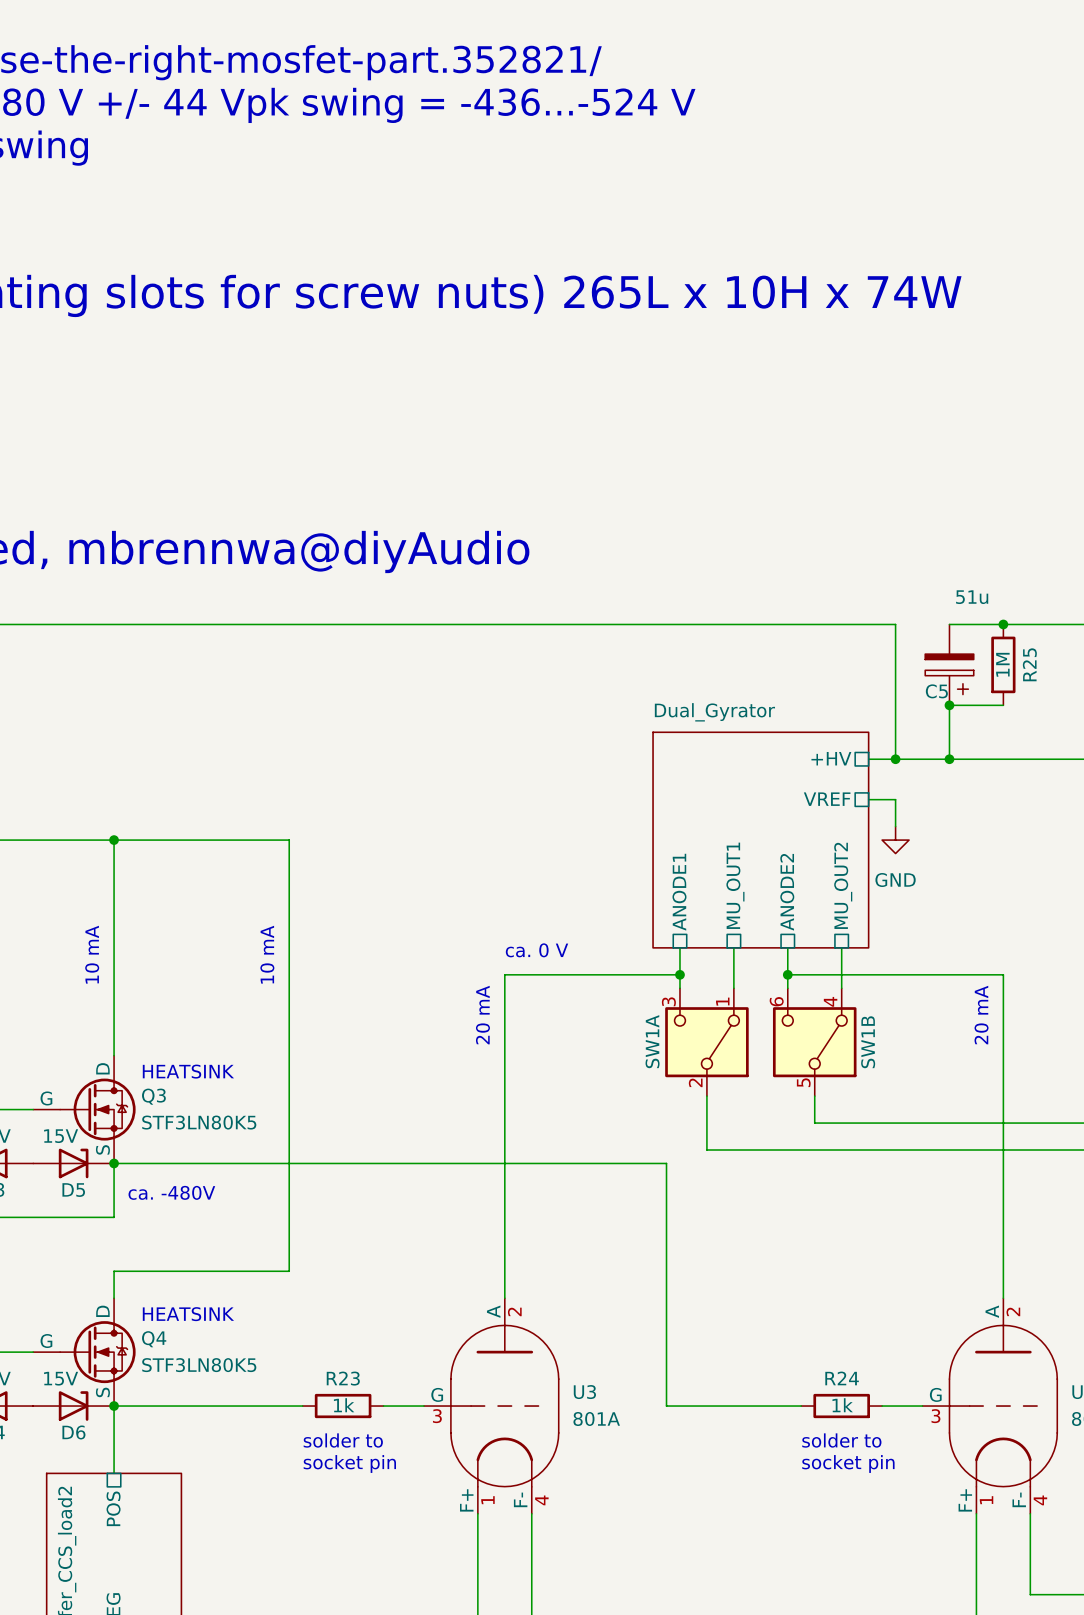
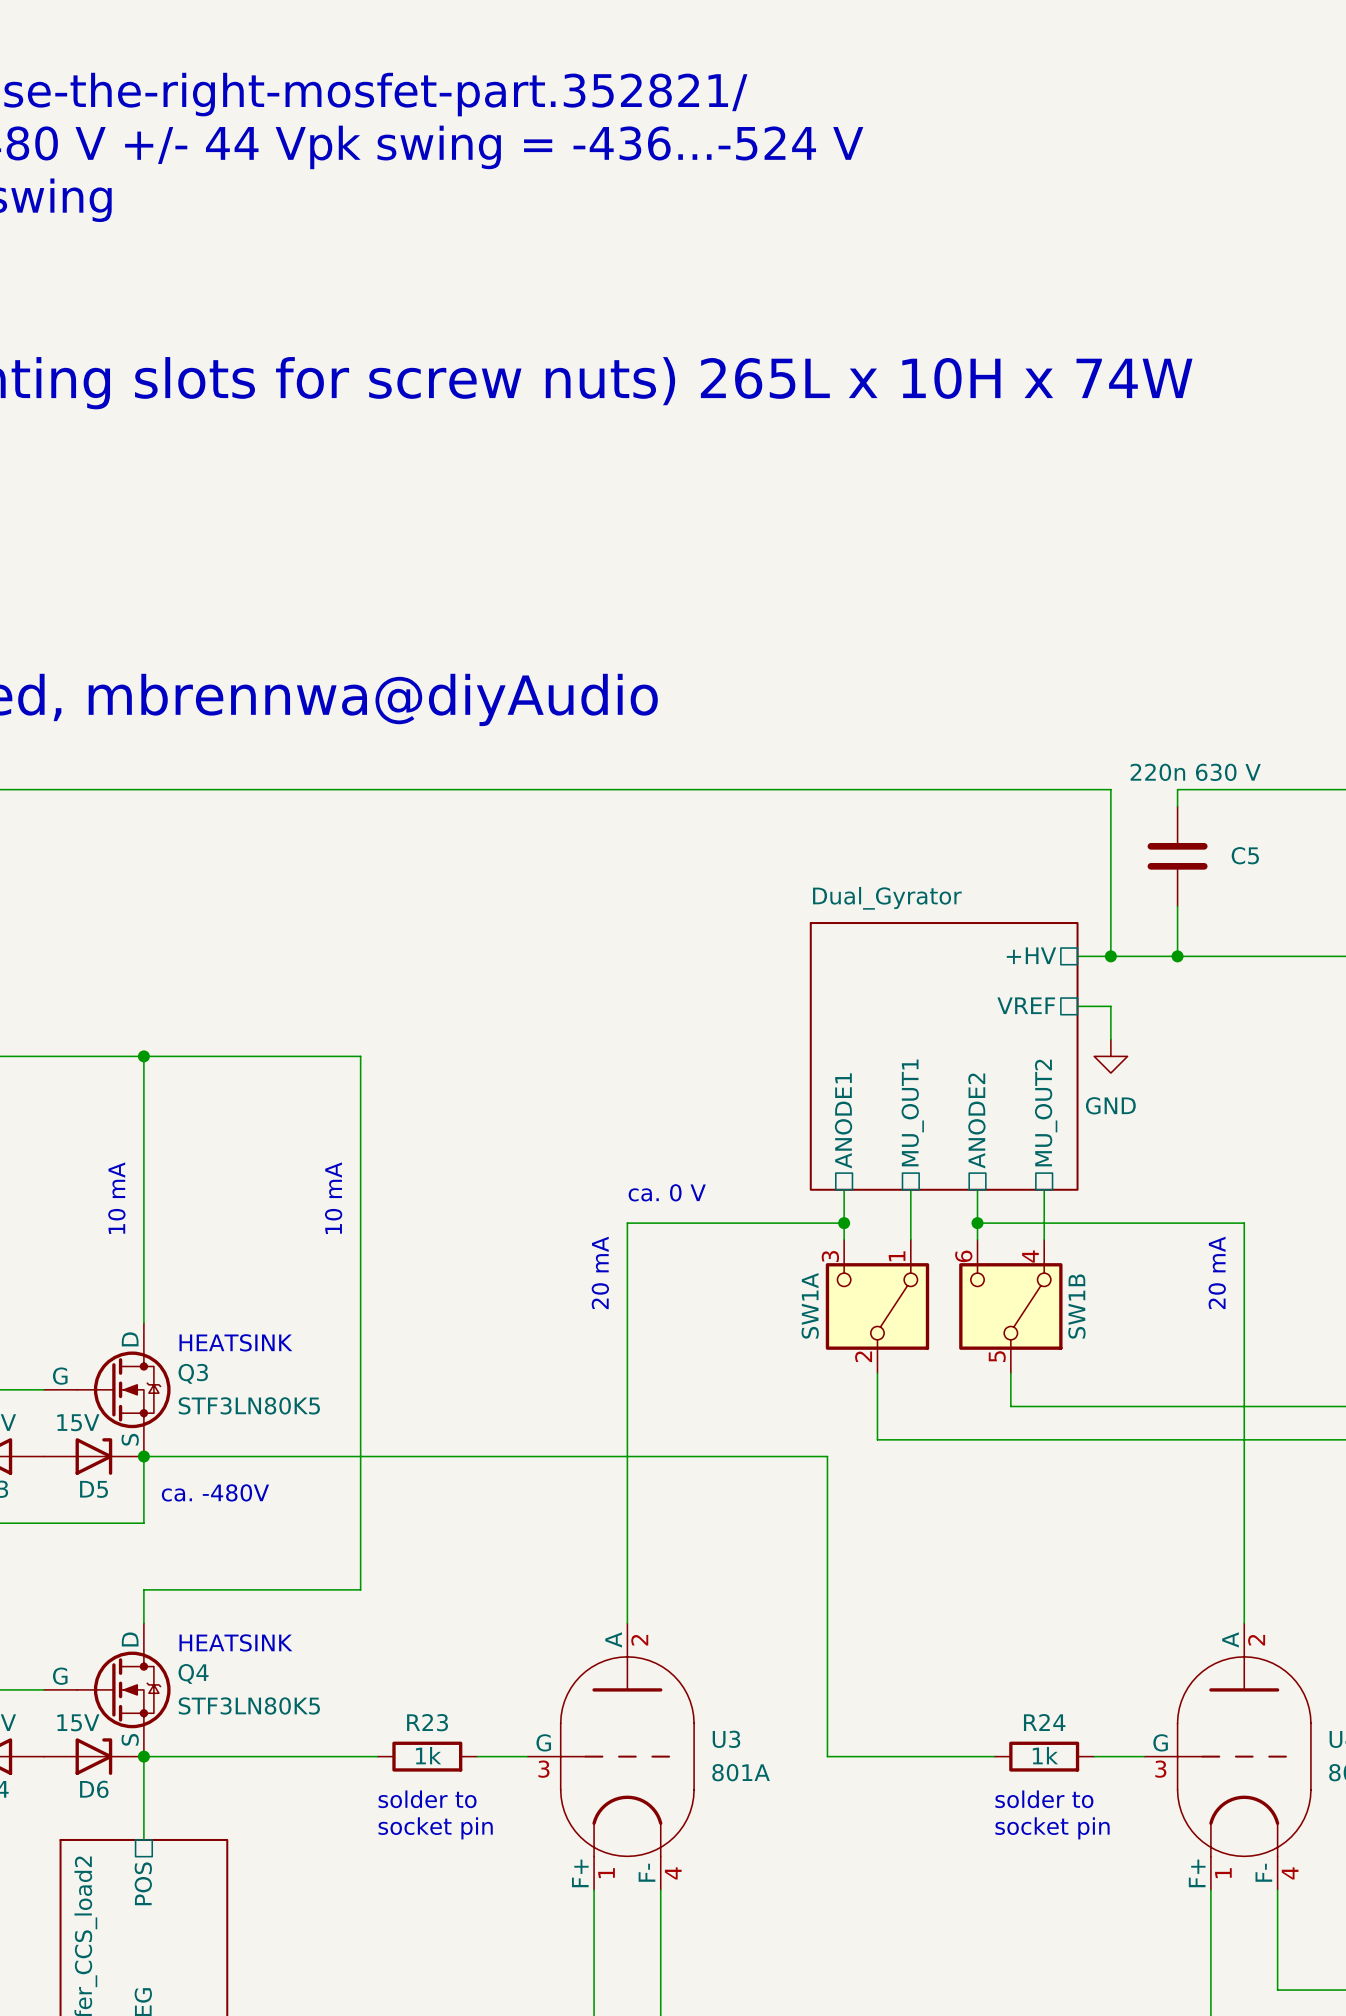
C5 value: 51u (972, 597) -> 220n 630 V (1195, 772)
C5 symbol: [925, 624, 974, 706] -> [1147, 806, 1208, 907]
junction: (1003, 624) -> none
R25: 1M (1003, 664) -> none
C5 name position: C5 (936, 691) -> C5 (1245, 855)
junction: (949, 705) -> none
wire: (1003, 705) (949, 705) (949, 718) -> none

